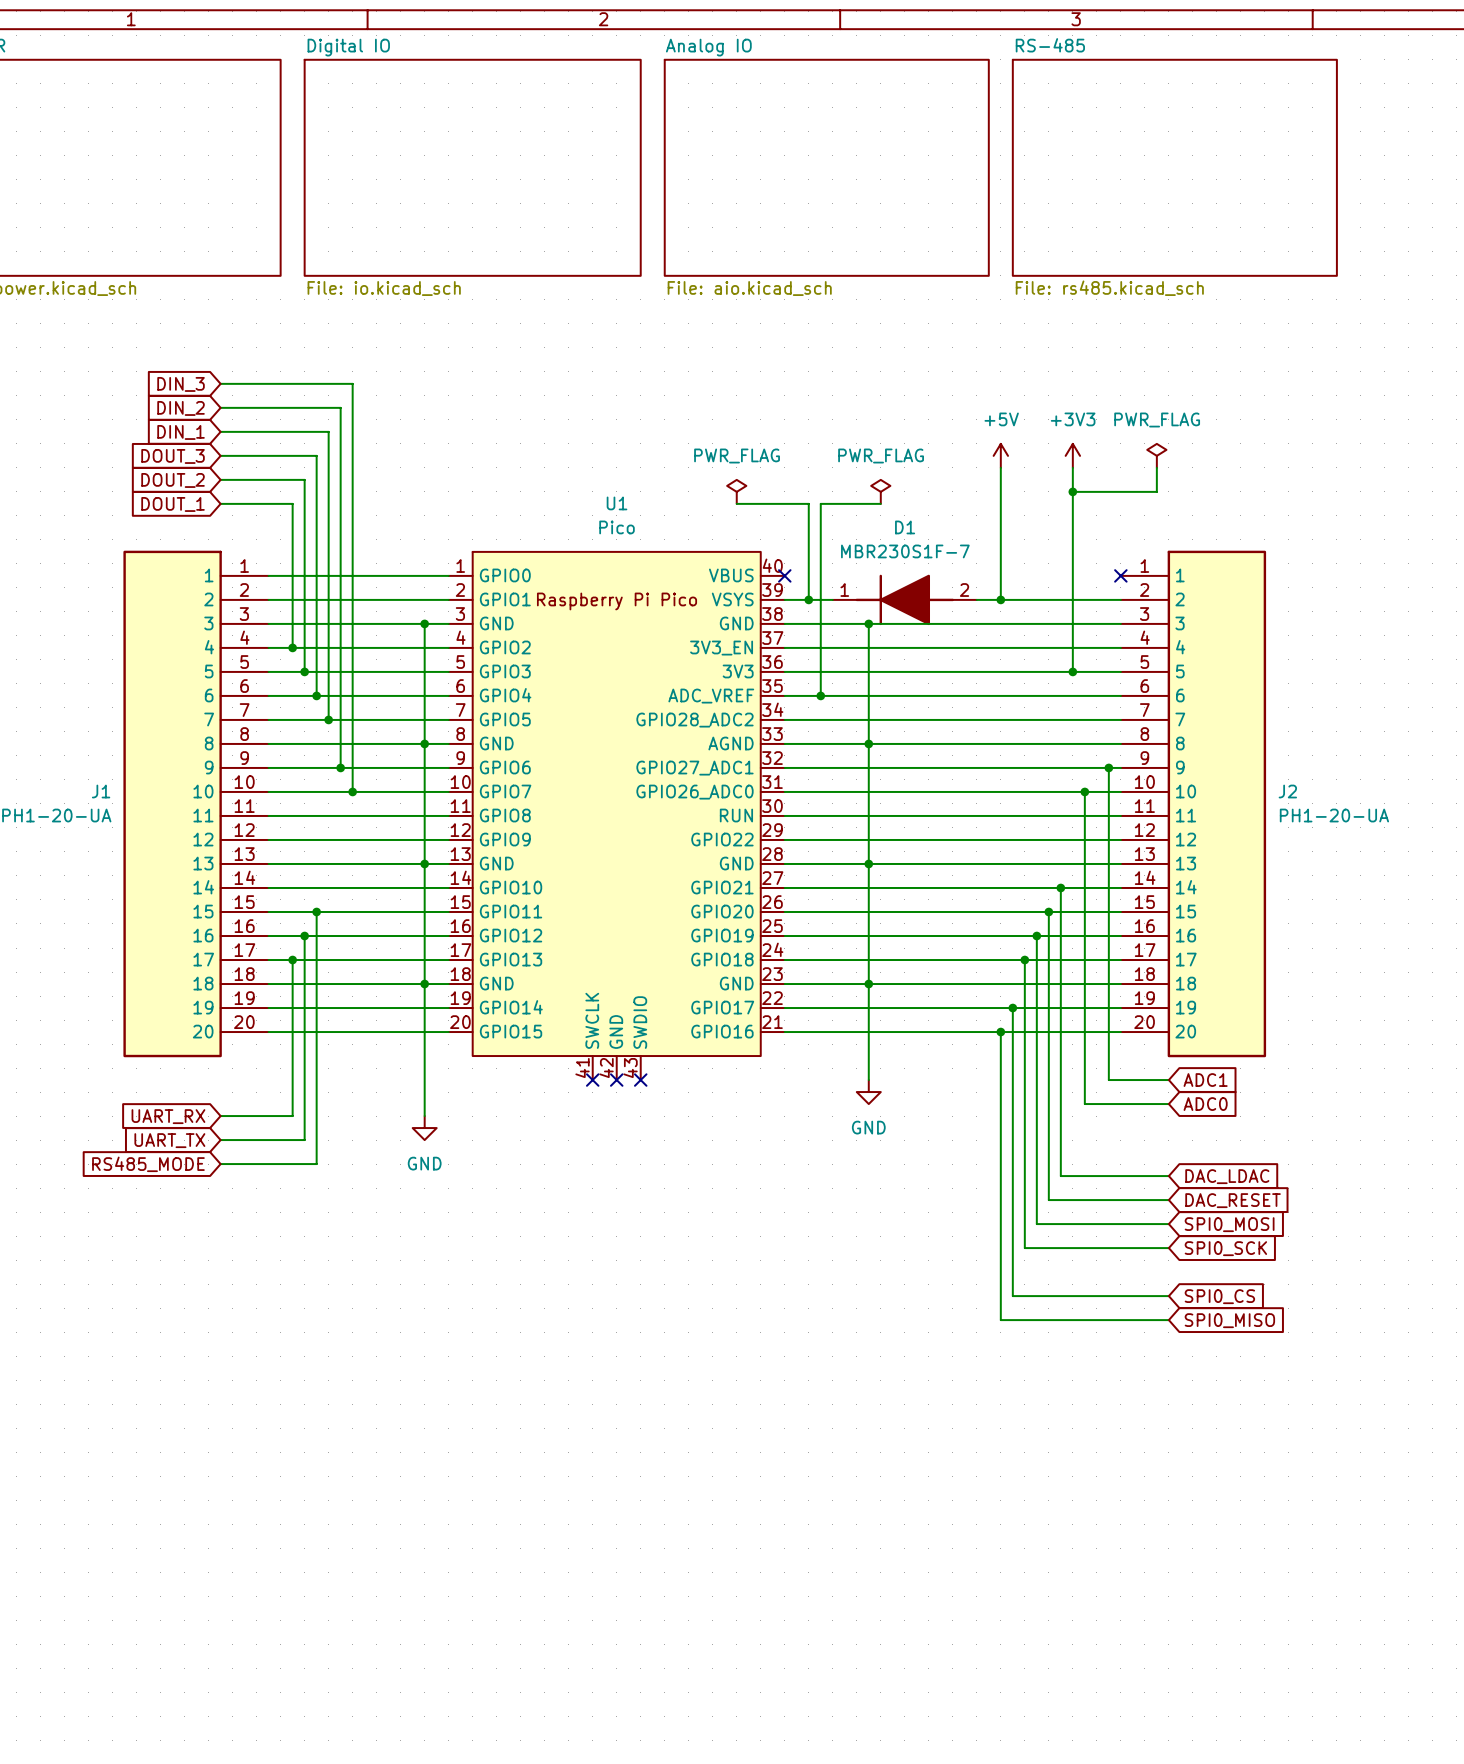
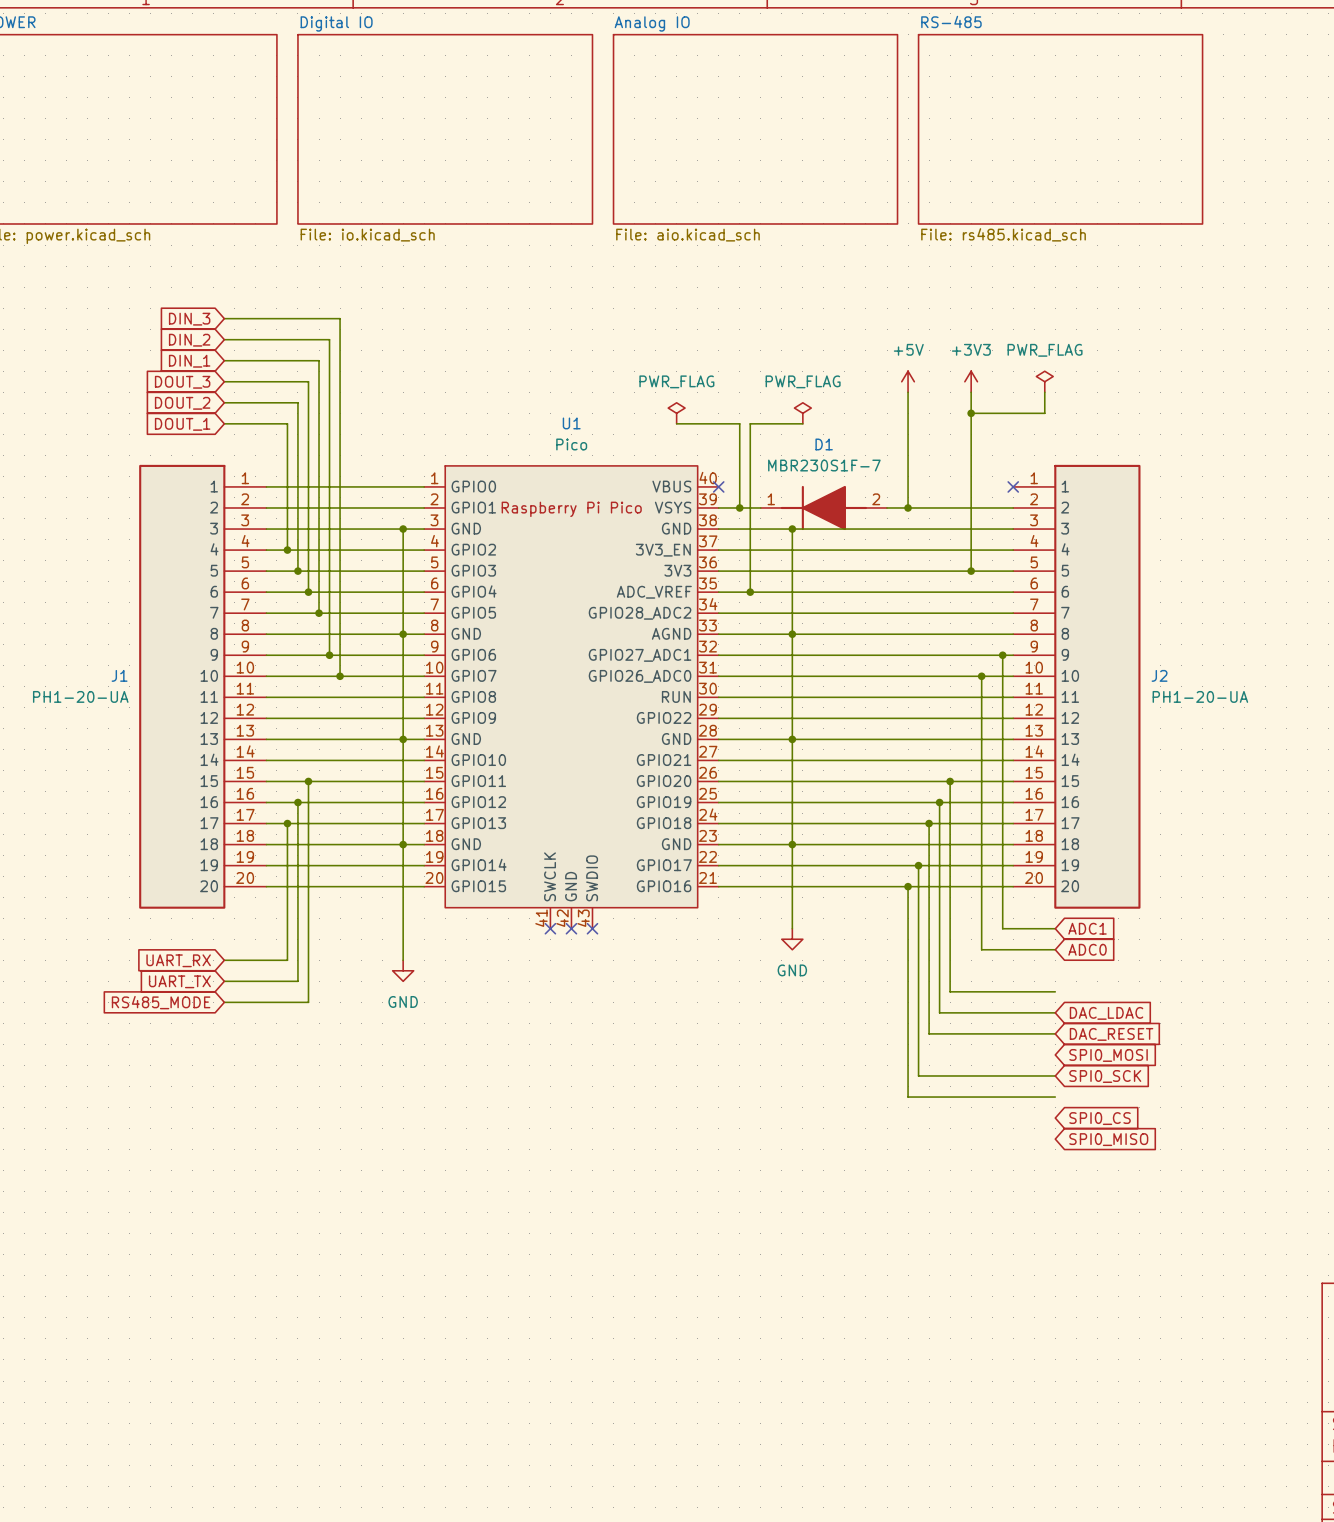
wire: (1060, 887) (1060, 1176) -> none
junction: (1060, 887) -> none
wire: (1048, 1152) (1048, 1200) -> (929, 1033) (950, 1033)
wire: none -> (950, 991) (1055, 991)
wire: (1036, 1176) (1036, 1224) (1168, 1224) -> (939, 1012) (960, 1012)
wire: (1024, 1200) (1024, 1248) -> (918, 1075) (929, 1075)
wire: (1012, 1248) (1012, 1296) (1168, 1296) -> none
wire: (1000, 1272) (1000, 1320) (1168, 1320) -> (908, 1097) (1055, 1097)

